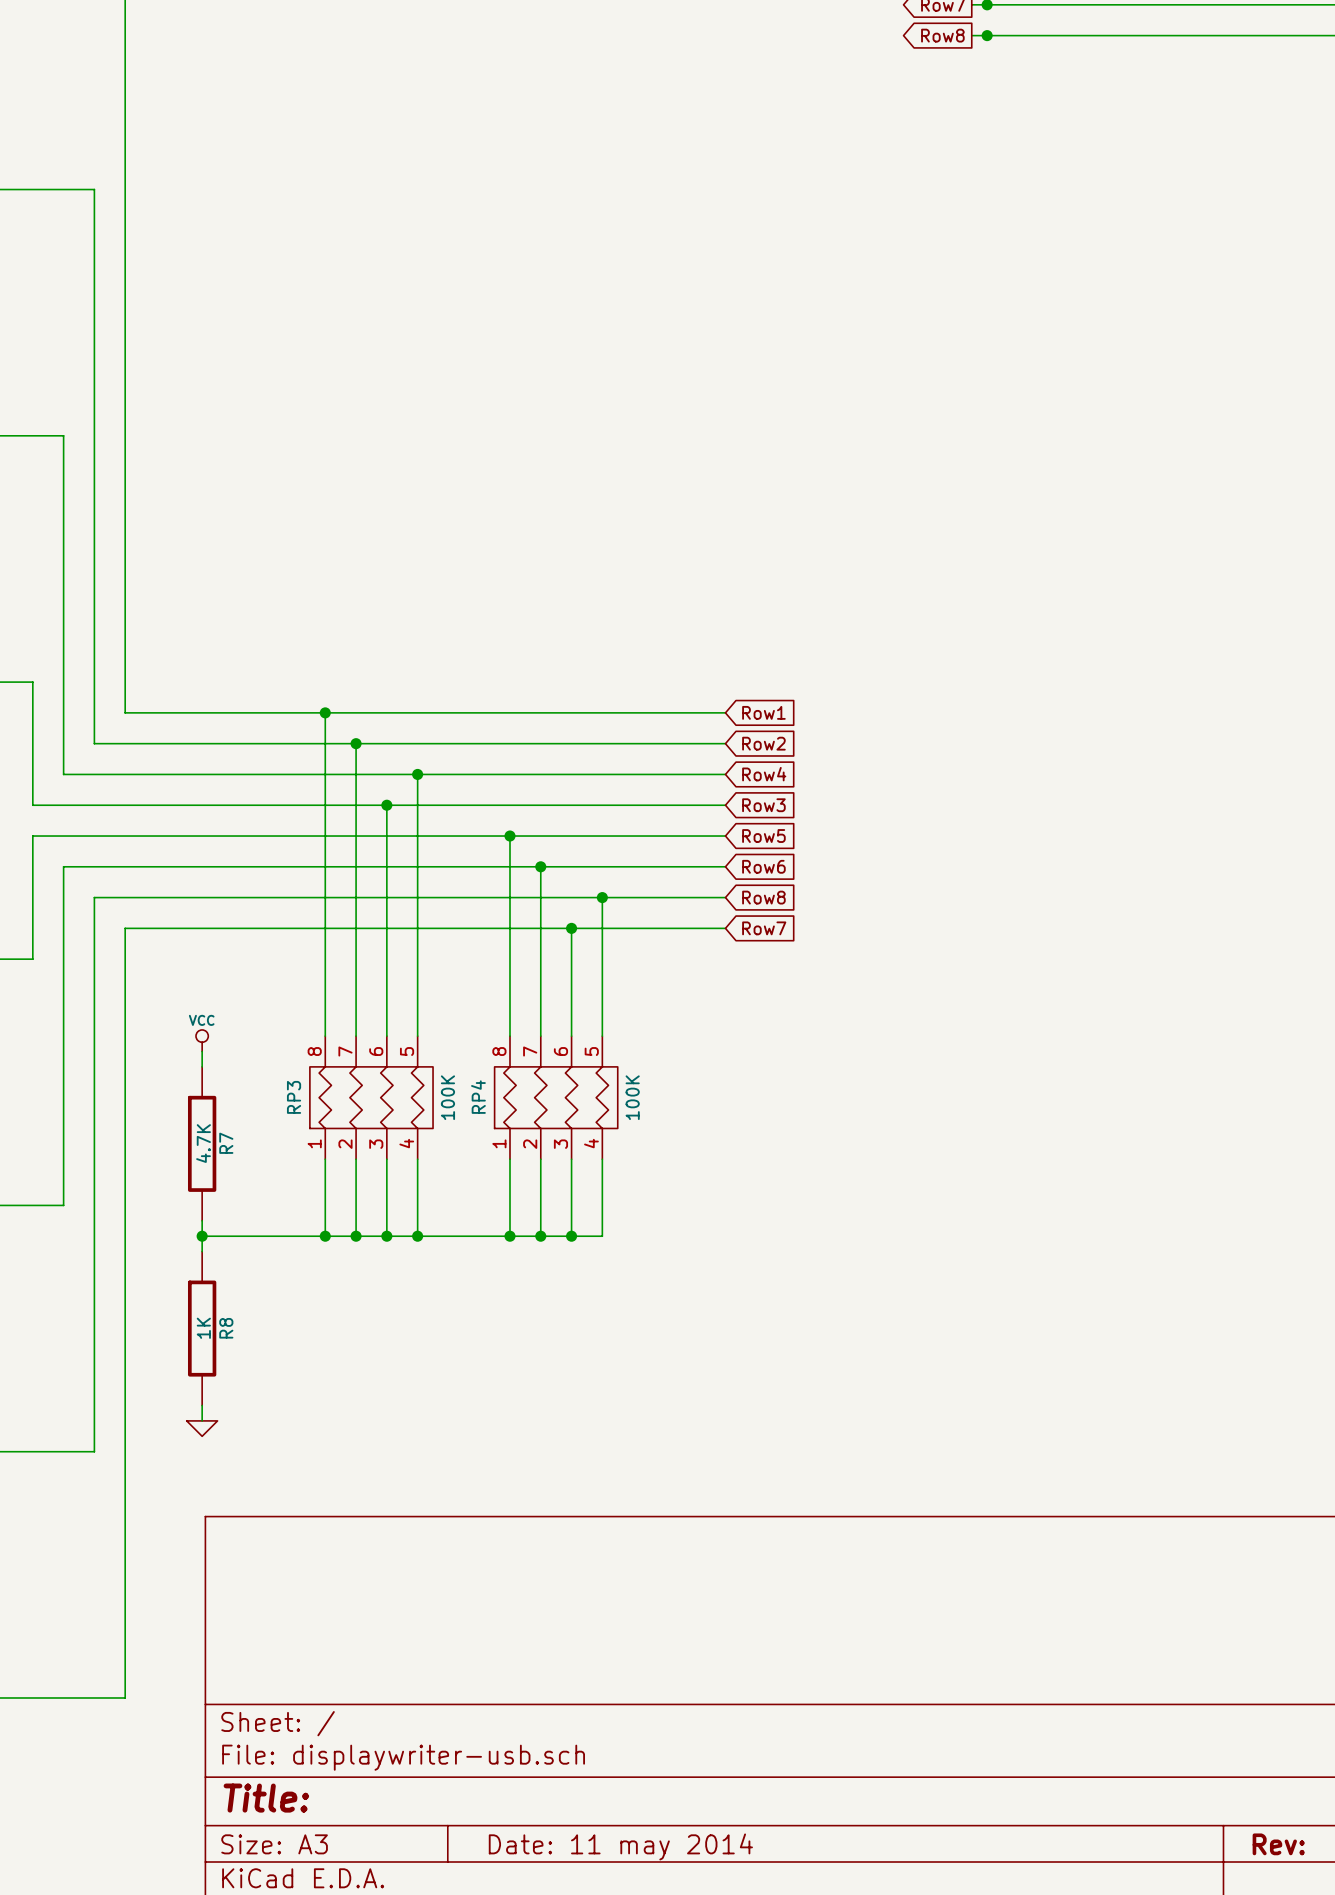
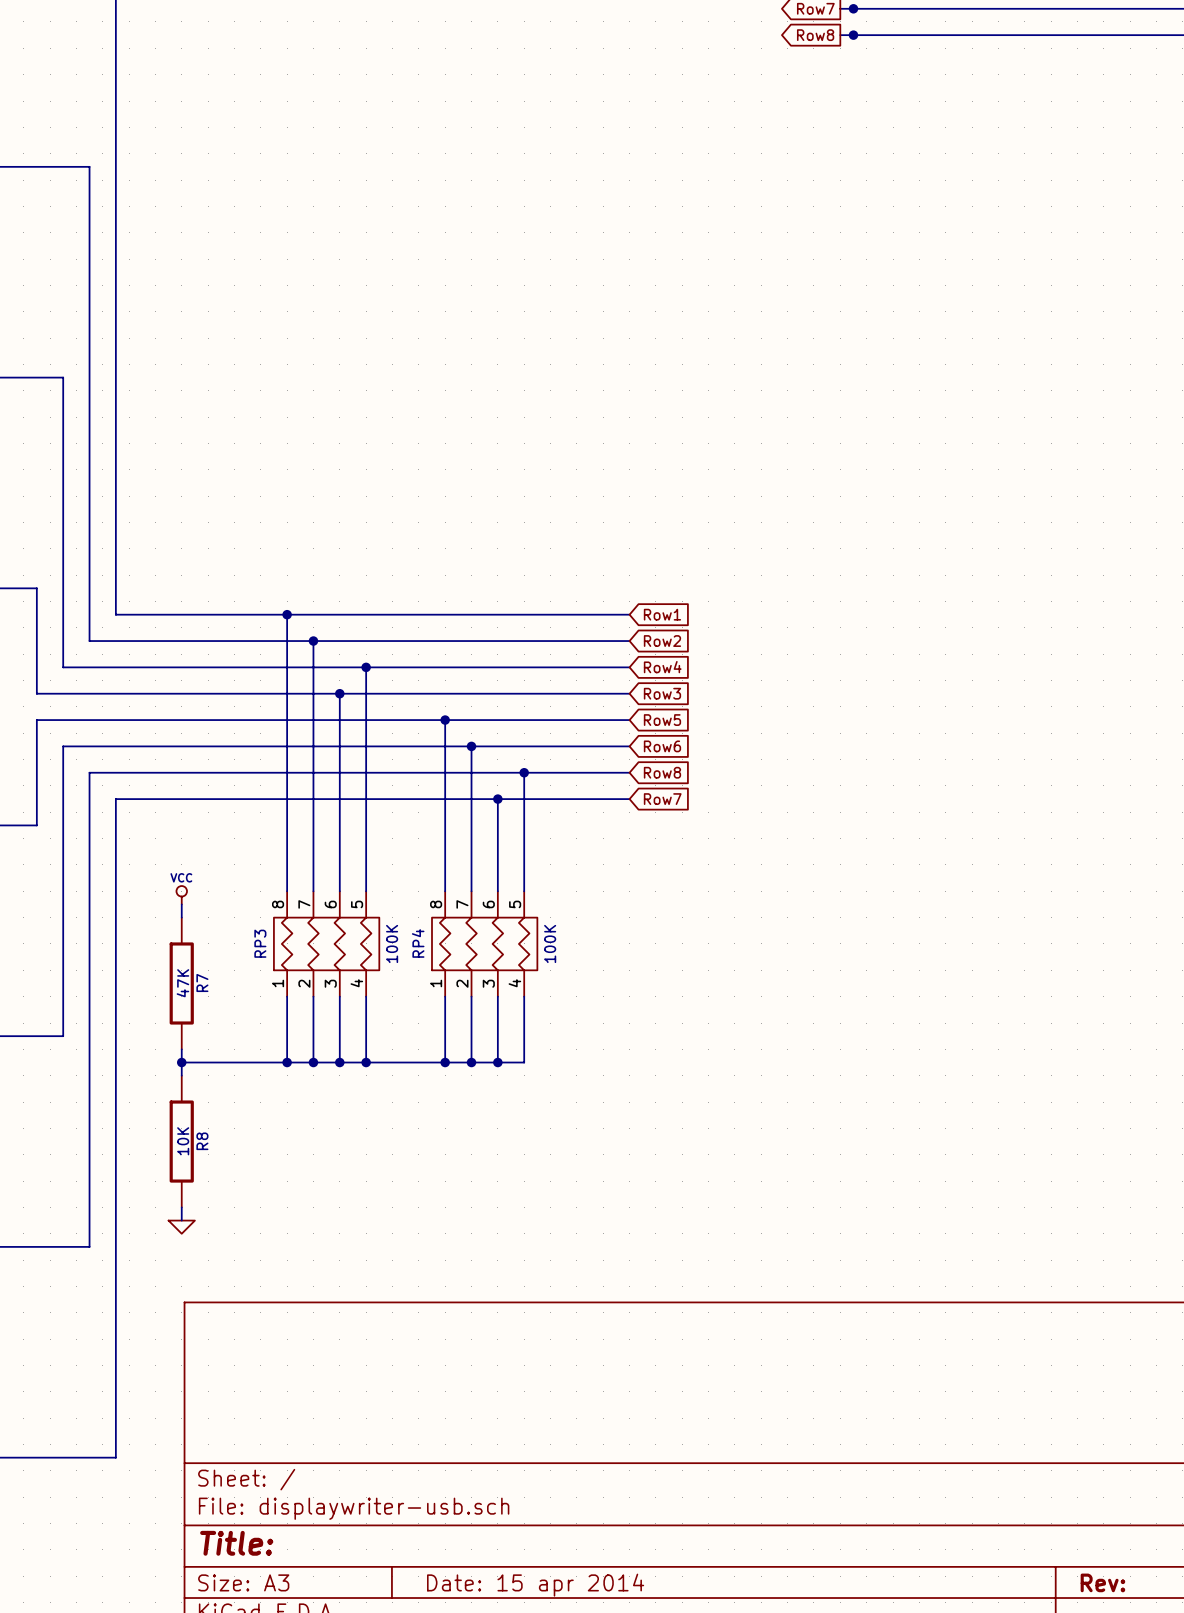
R7 value: 4.7K (203, 1143) -> 47K (182, 983)
R8 value: 1K (203, 1328) -> 10K (183, 1141)
title block: Date: 11 may 2014 (620, 1846) -> Date: 15 apr 2014 (535, 1585)

